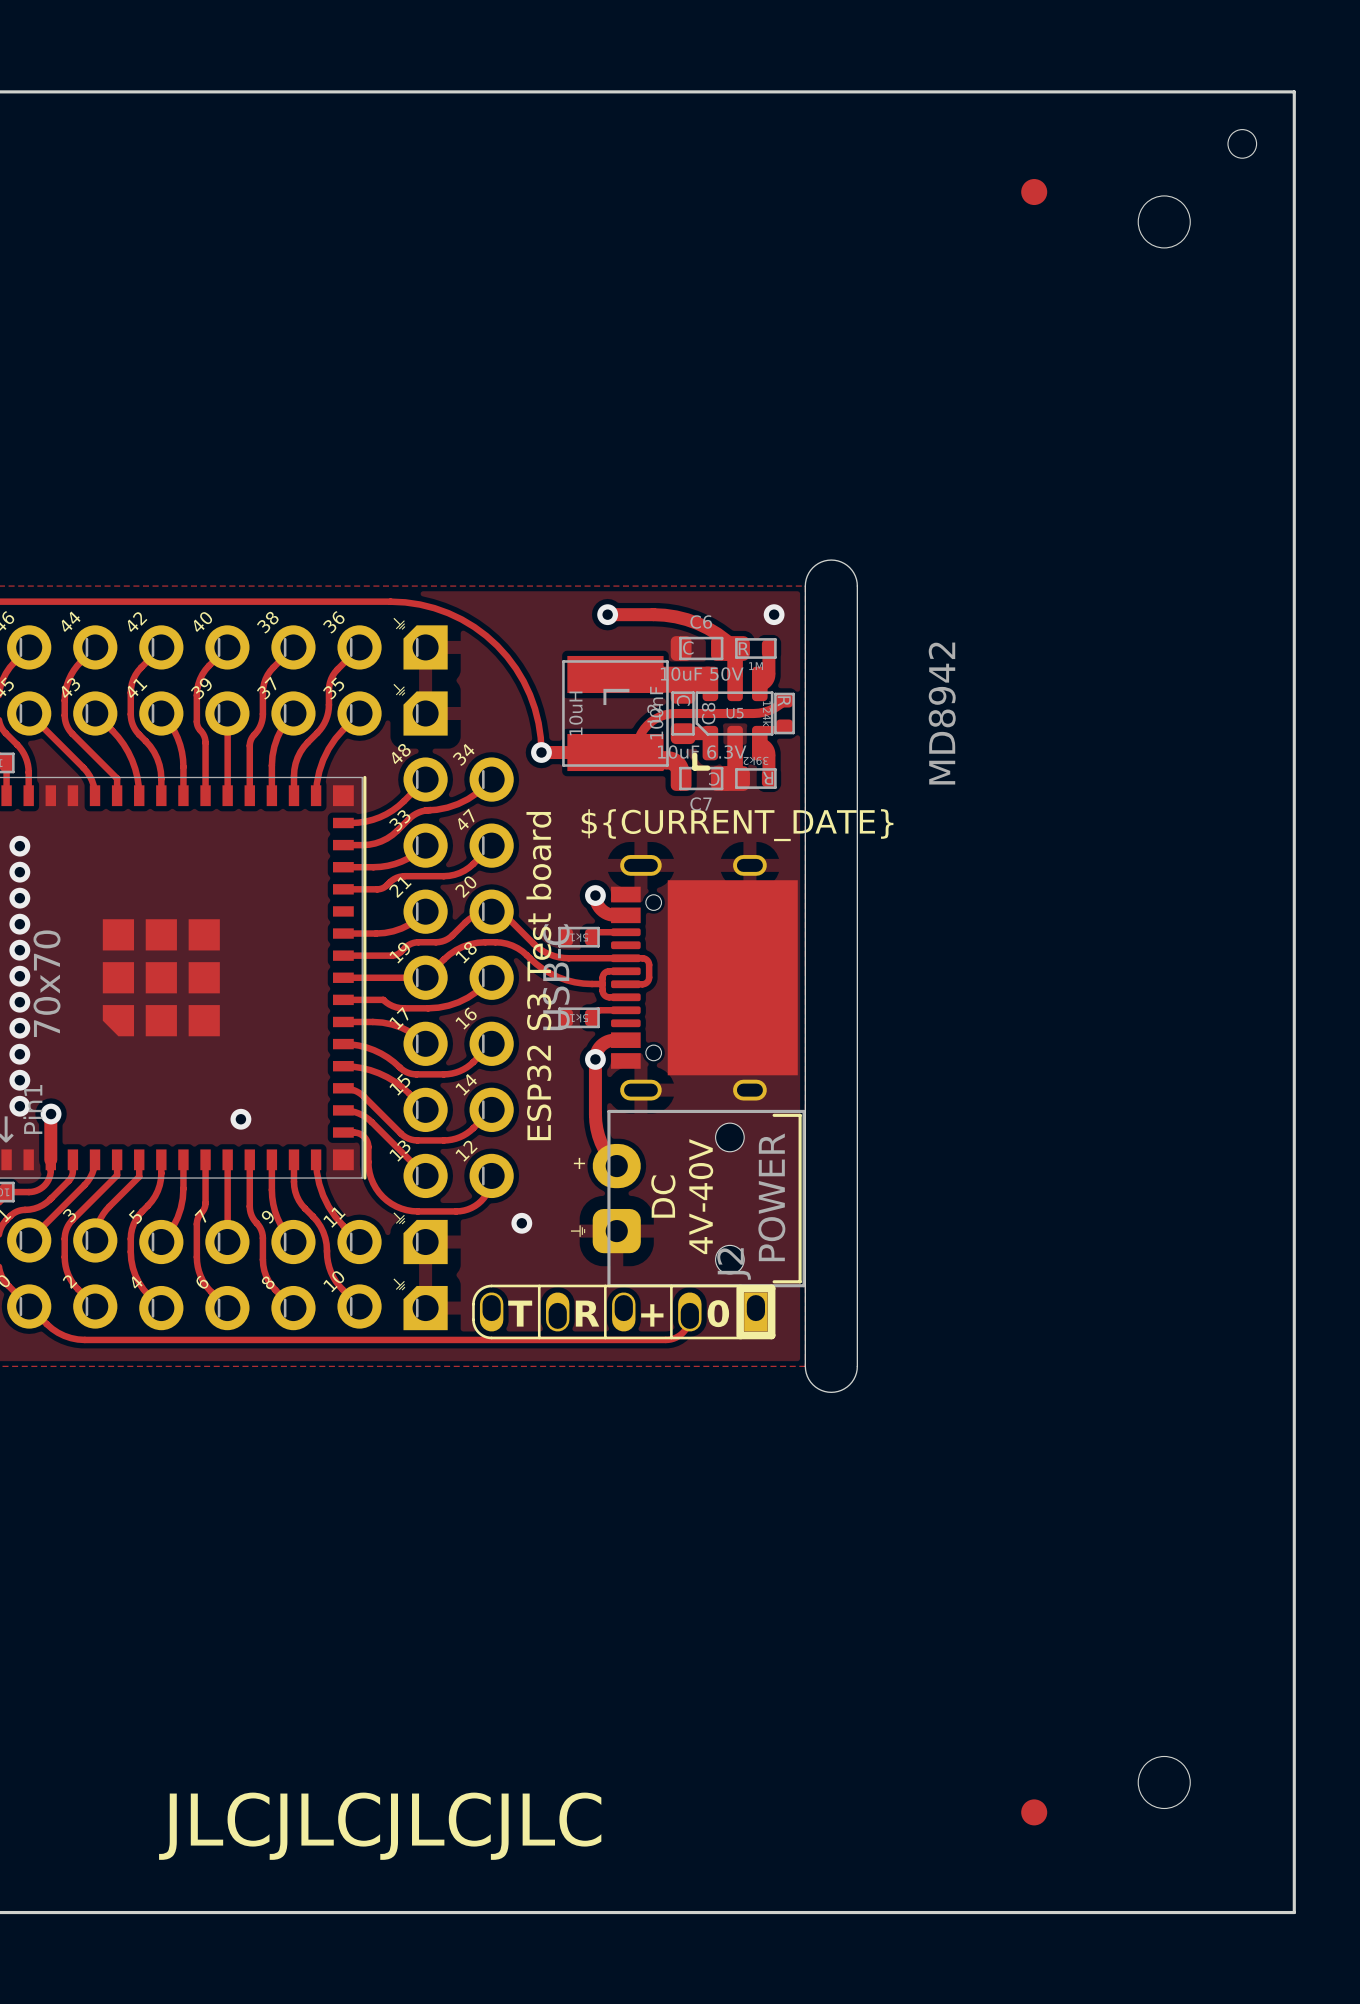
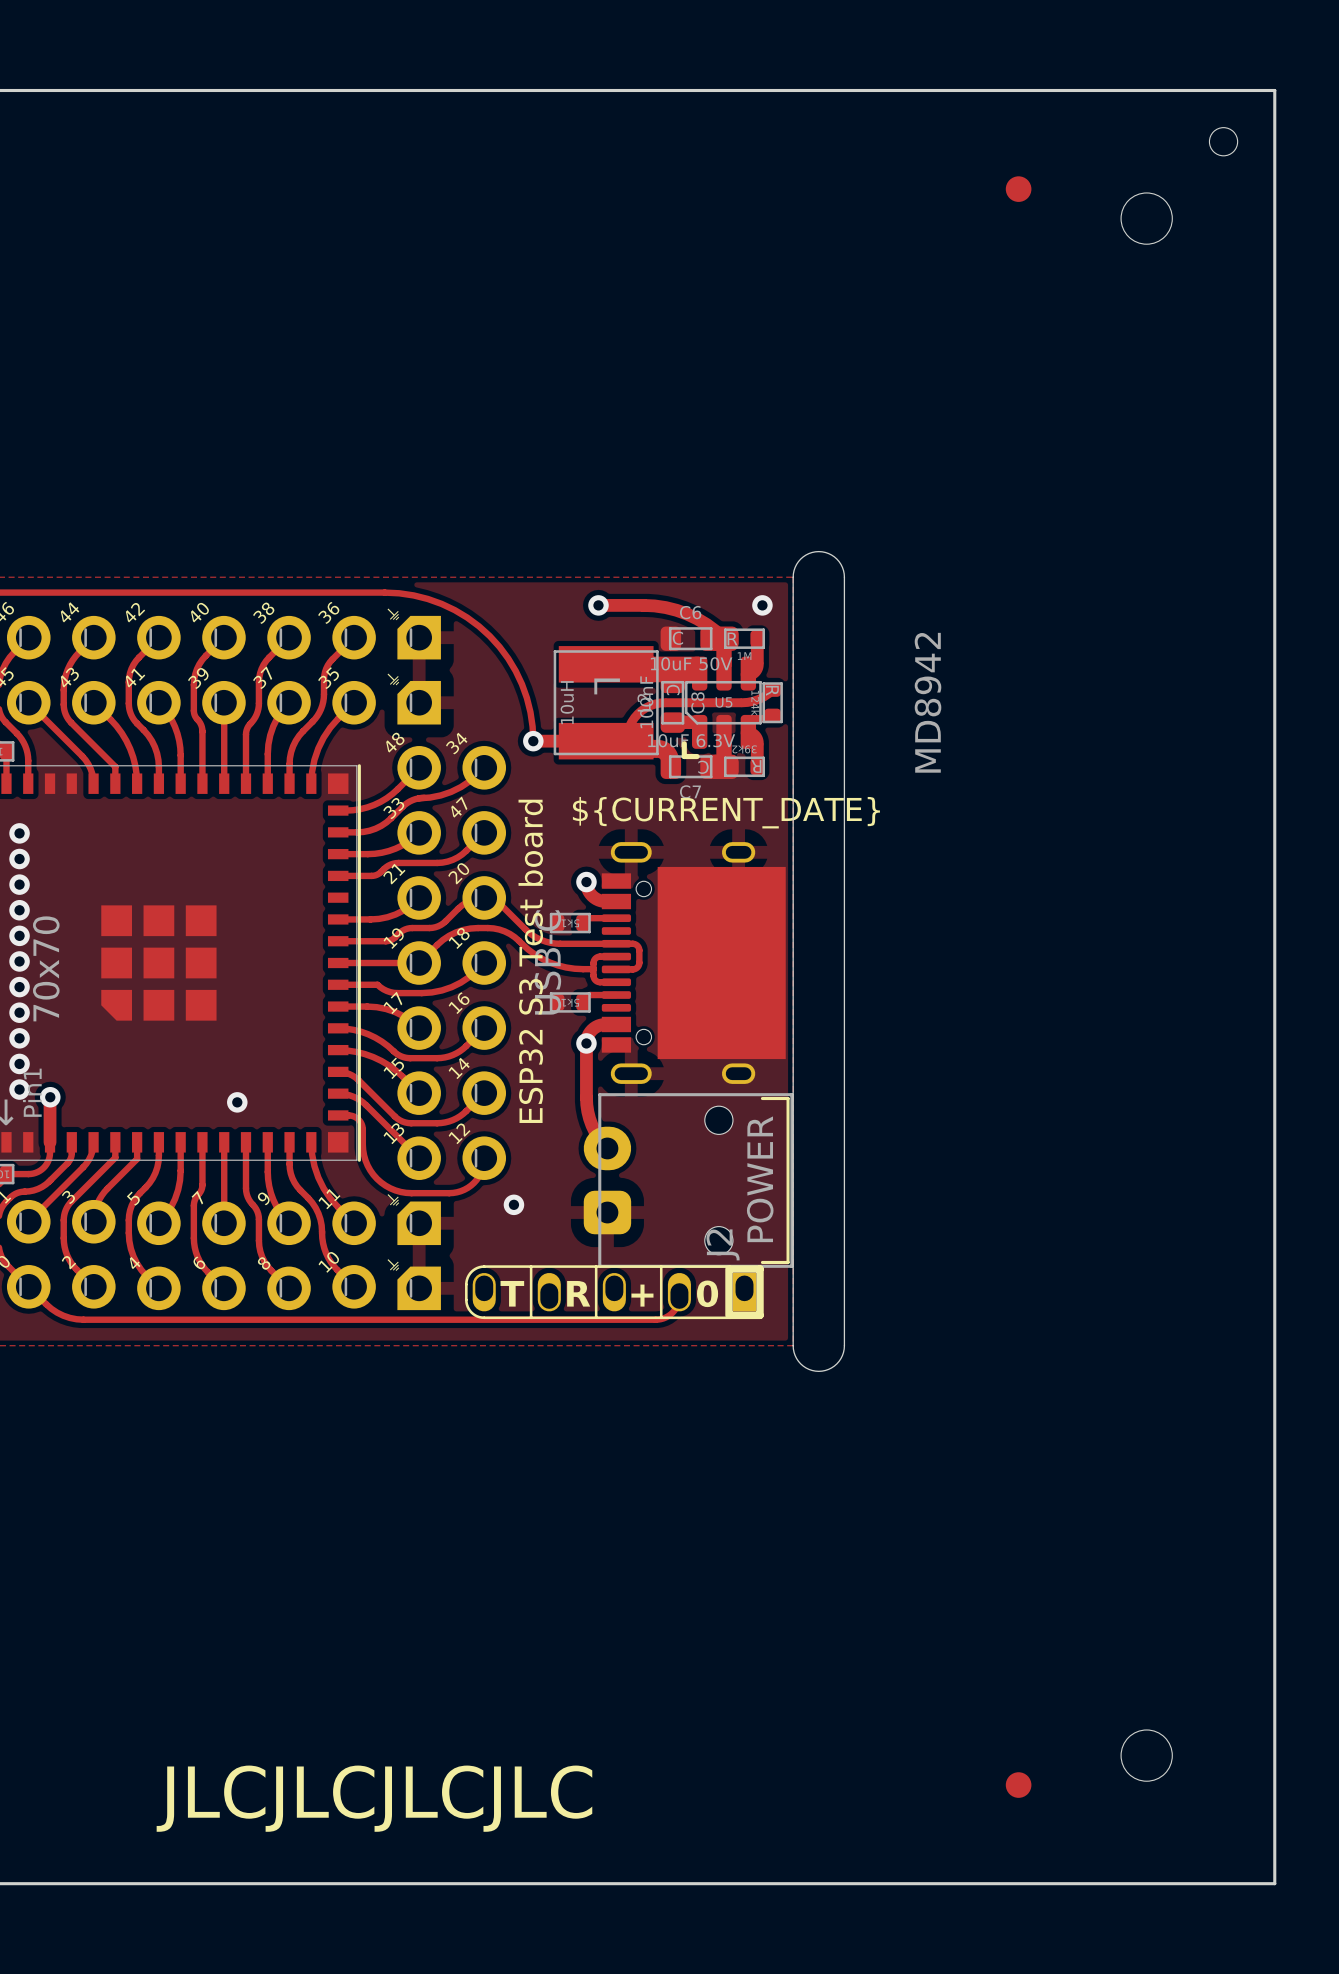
text: + (579, 1163) -> none
text: DC (663, 1196) -> none
text: 4V-40V (701, 1196) -> none
text: ⏚ (578, 1231) -> none

